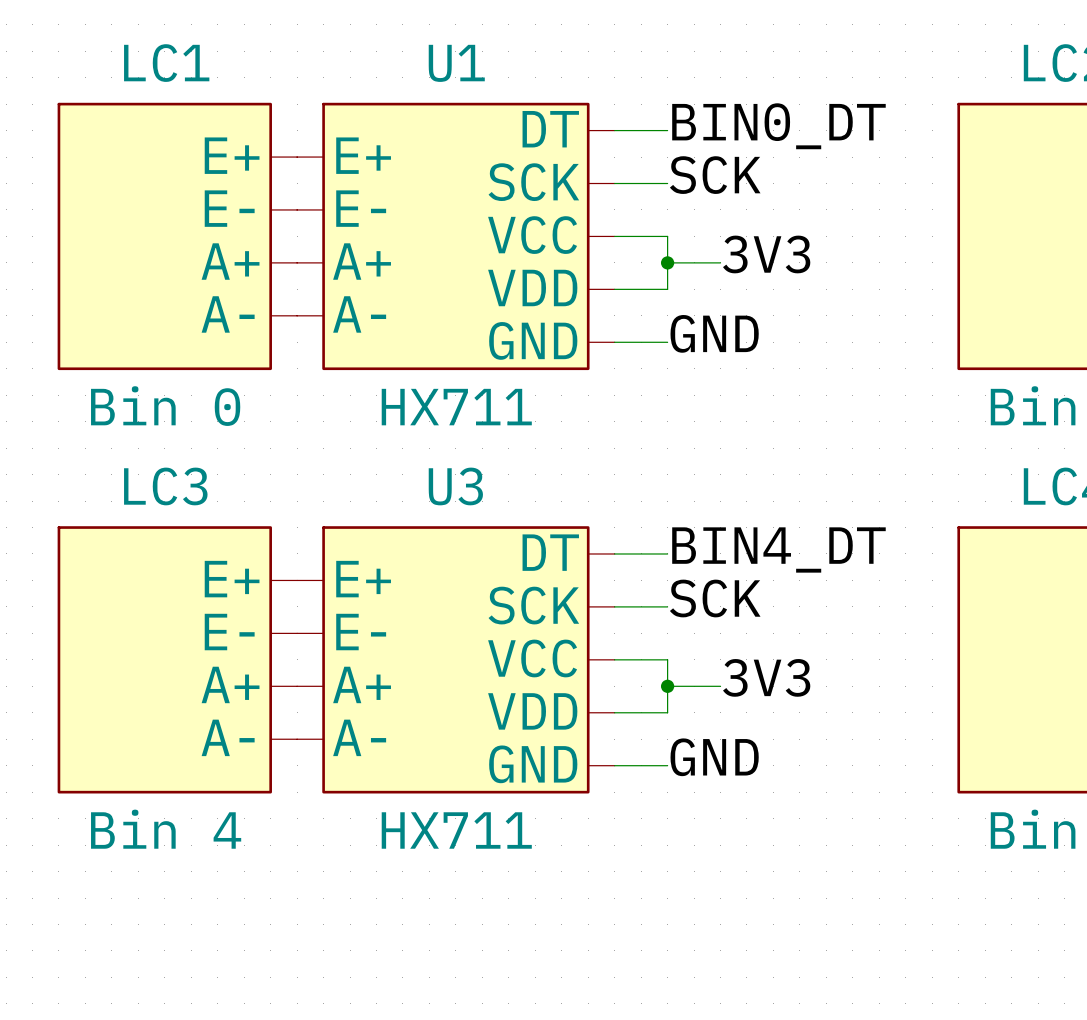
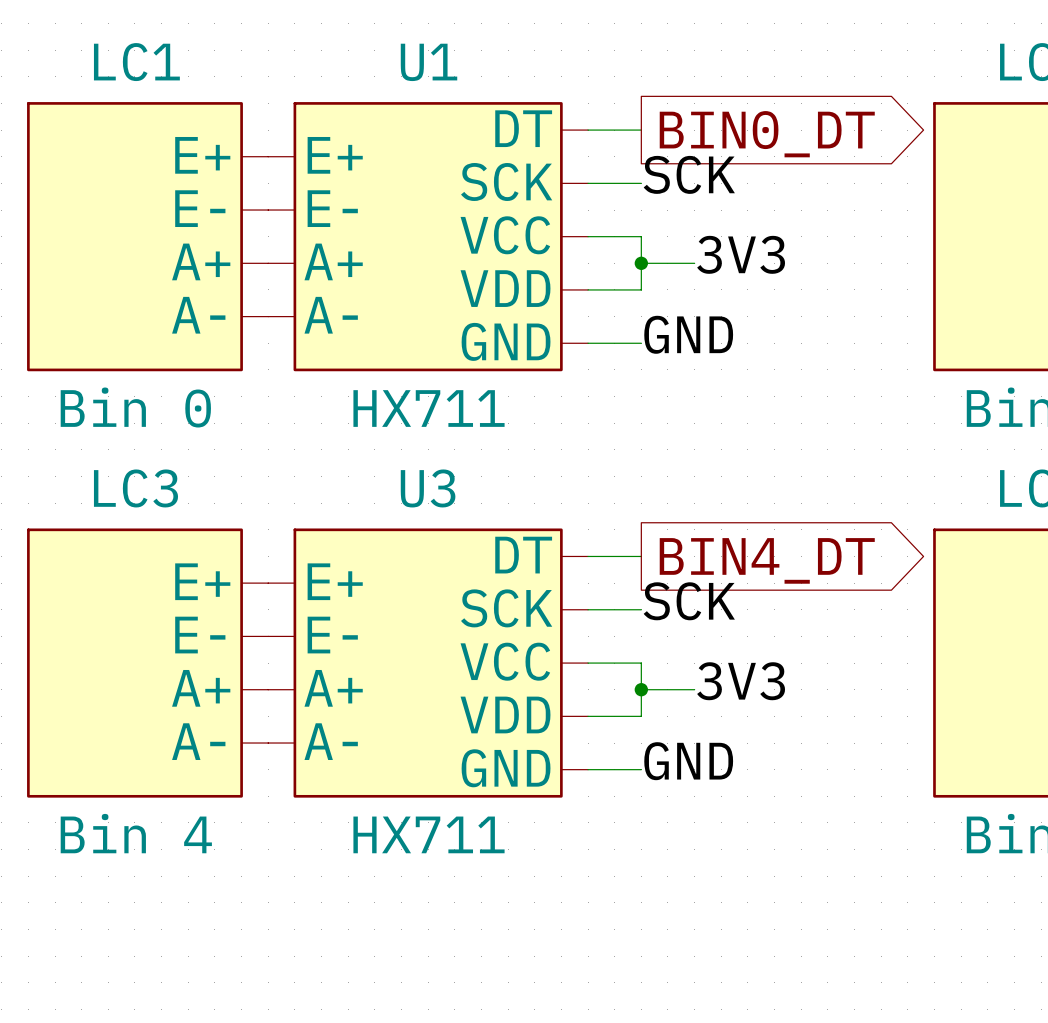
label: BIN0_DT (778, 126) -> none
global label: none -> BIN0_DT (767, 134)
label: BIN4_DT (778, 549) -> none
global label: none -> BIN4_DT (767, 560)

